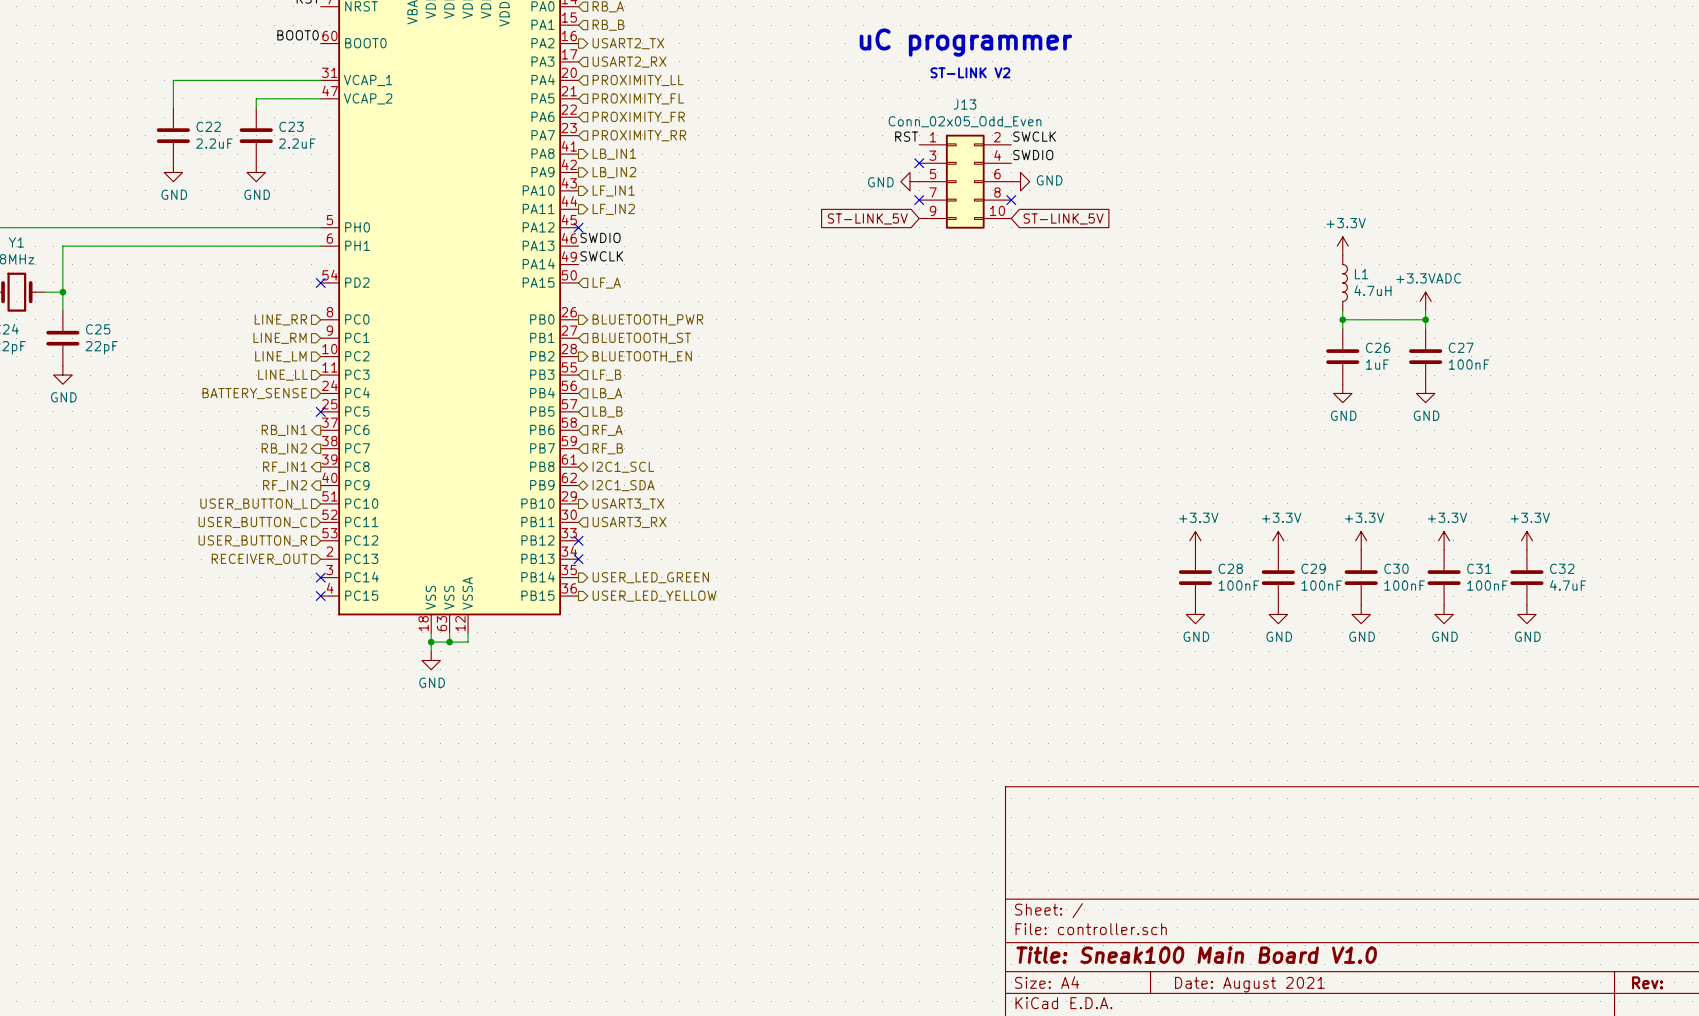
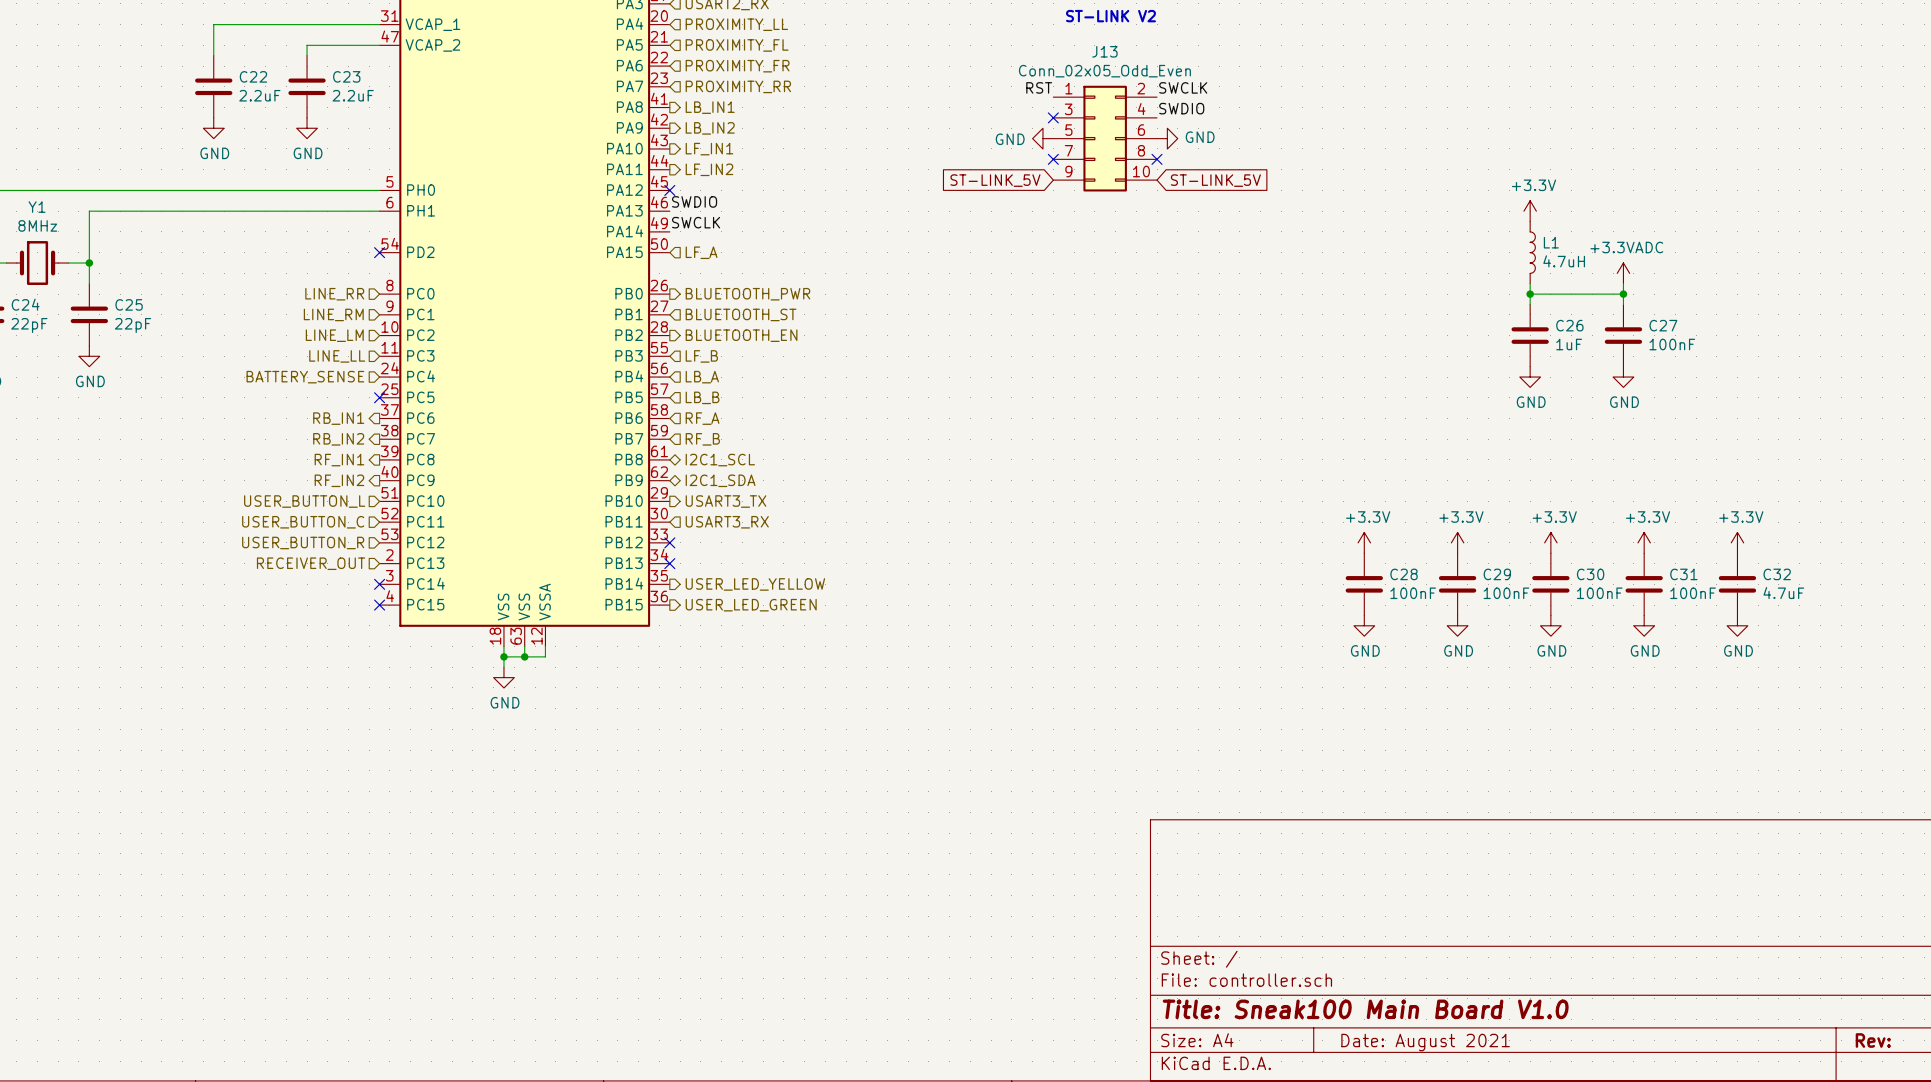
hierarchical label: USER_LED_GREEN (650, 577) -> USER_LED_YELLOW (755, 584)
hierarchical label: USER_LED_YELLOW (654, 596) -> USER_LED_GREEN (751, 605)

